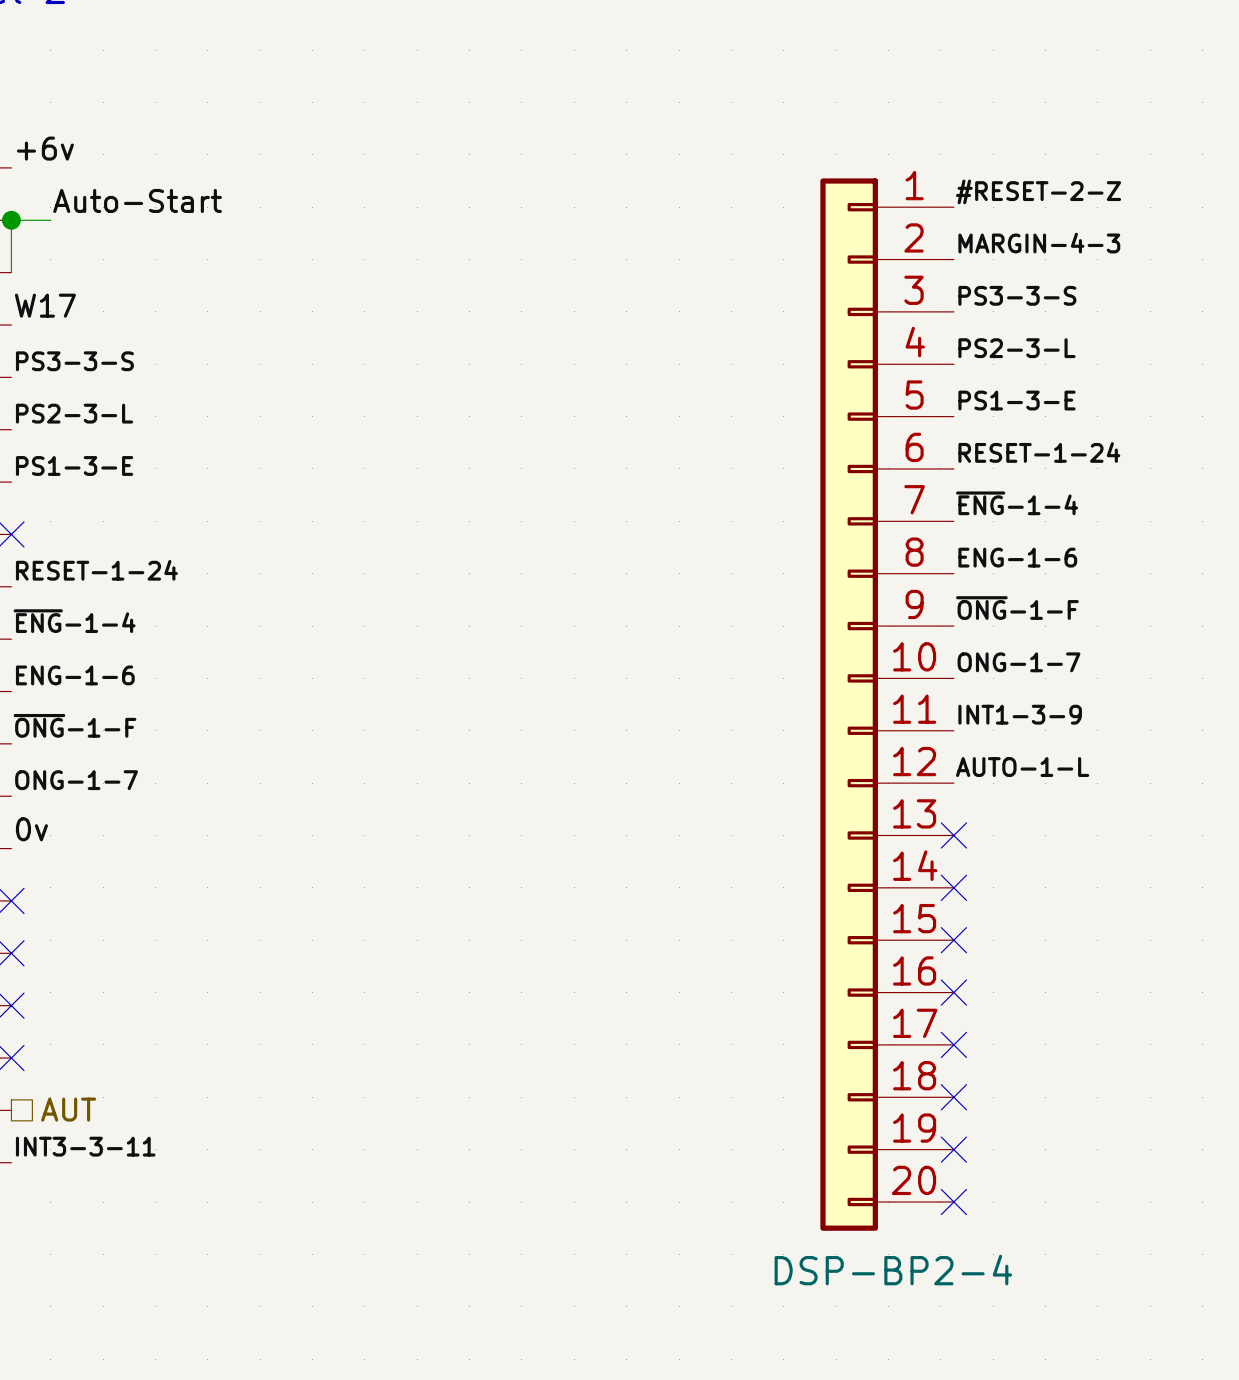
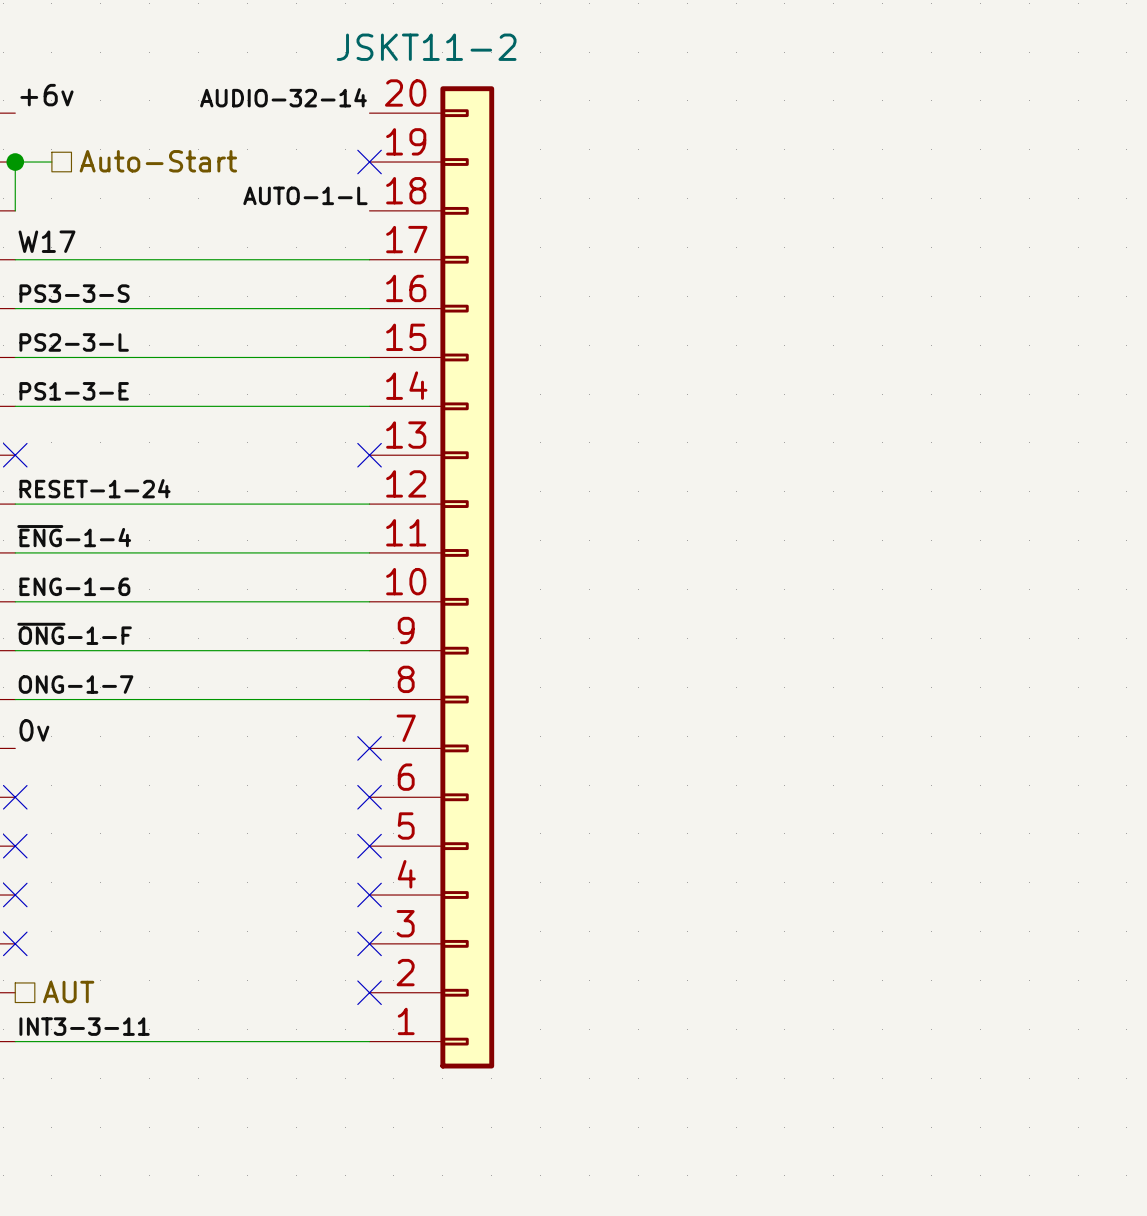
label: none -> AUDIO-32-14 (283, 97)
label: #RESET-2-Z (1038, 191) -> none
label: Auto-Start (137, 200) -> none
hierarchical label: none -> Auto-Start (158, 161)
no-connect mark: none -> (369, 162)
label: MARGIN-4-3 (1039, 243) -> none
label: none -> AUTO-1-L (305, 195)
label: PS3-3-S (1017, 295) -> none
wire: none -> (15, 259) (369, 259)
label: PS2-3-L (1016, 348) -> none
wire: none -> (15, 308) (369, 308)
label: PS1-3-E (1016, 400) -> none
wire: none -> (15, 357) (369, 357)
label: RESET-1-24 (1039, 452) -> none
wire: none -> (15, 406) (369, 406)
label: ~{ENG}-1-4 (1017, 503) -> none
no-connect mark: none -> (369, 455)
label: ENG-1-6 (1017, 557) -> none
wire: none -> (15, 504) (369, 504)
label: ~{ONG}-1-F (1017, 608) -> none
wire: none -> (15, 552) (369, 552)
label: ONG-1-7 (1018, 662) -> none
JSKT11-2: none -> (431, 577)
wire: none -> (15, 601) (369, 601)
DSP-BP2-4: (887, 704) -> none
label: INT1-3-9 (1020, 714) -> none
wire: none -> (15, 650) (369, 650)
label: AUTO-1-L (1022, 767) -> none
wire: none -> (15, 699) (369, 699)
no-connect mark: (953, 835) -> none
no-connect mark: none -> (369, 748)
no-connect mark: (953, 887) -> none
no-connect mark: none -> (369, 797)
no-connect mark: (953, 940) -> none
no-connect mark: none -> (369, 846)
no-connect mark: (953, 992) -> none
no-connect mark: none -> (369, 895)
no-connect mark: (953, 1044) -> none
no-connect mark: none -> (369, 943)
no-connect mark: (953, 1097) -> none
no-connect mark: none -> (369, 992)
no-connect mark: (953, 1149) -> none
wire: none -> (15, 1041) (369, 1041)
no-connect mark: (953, 1202) -> none

